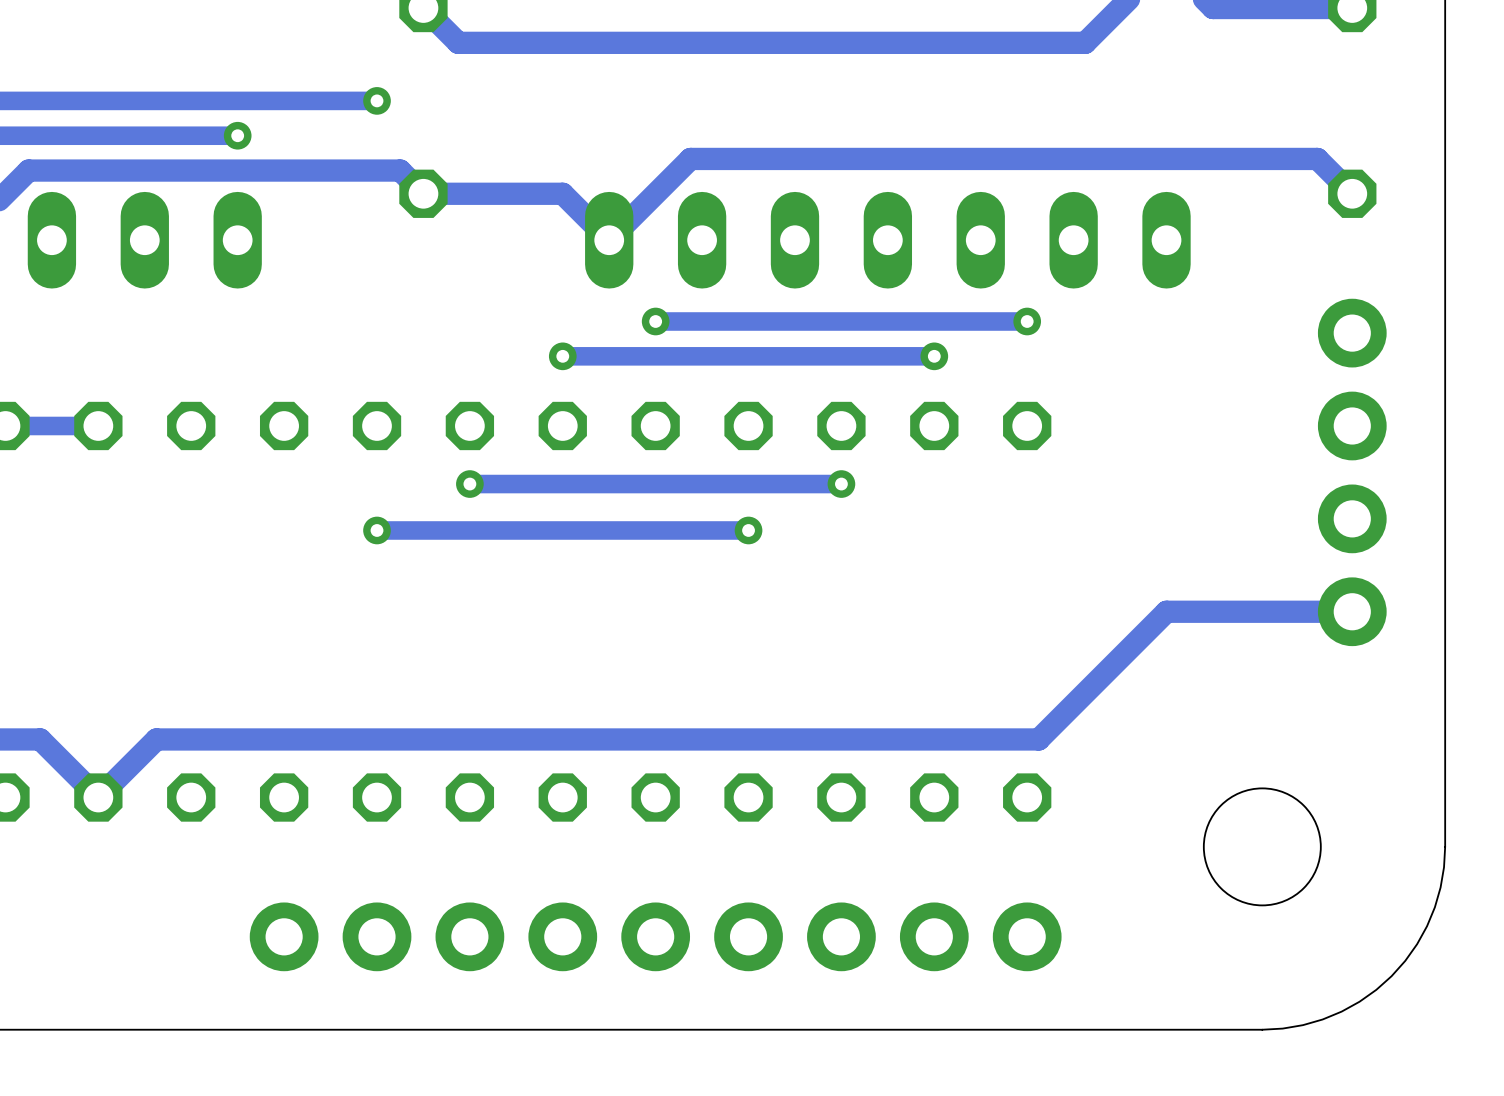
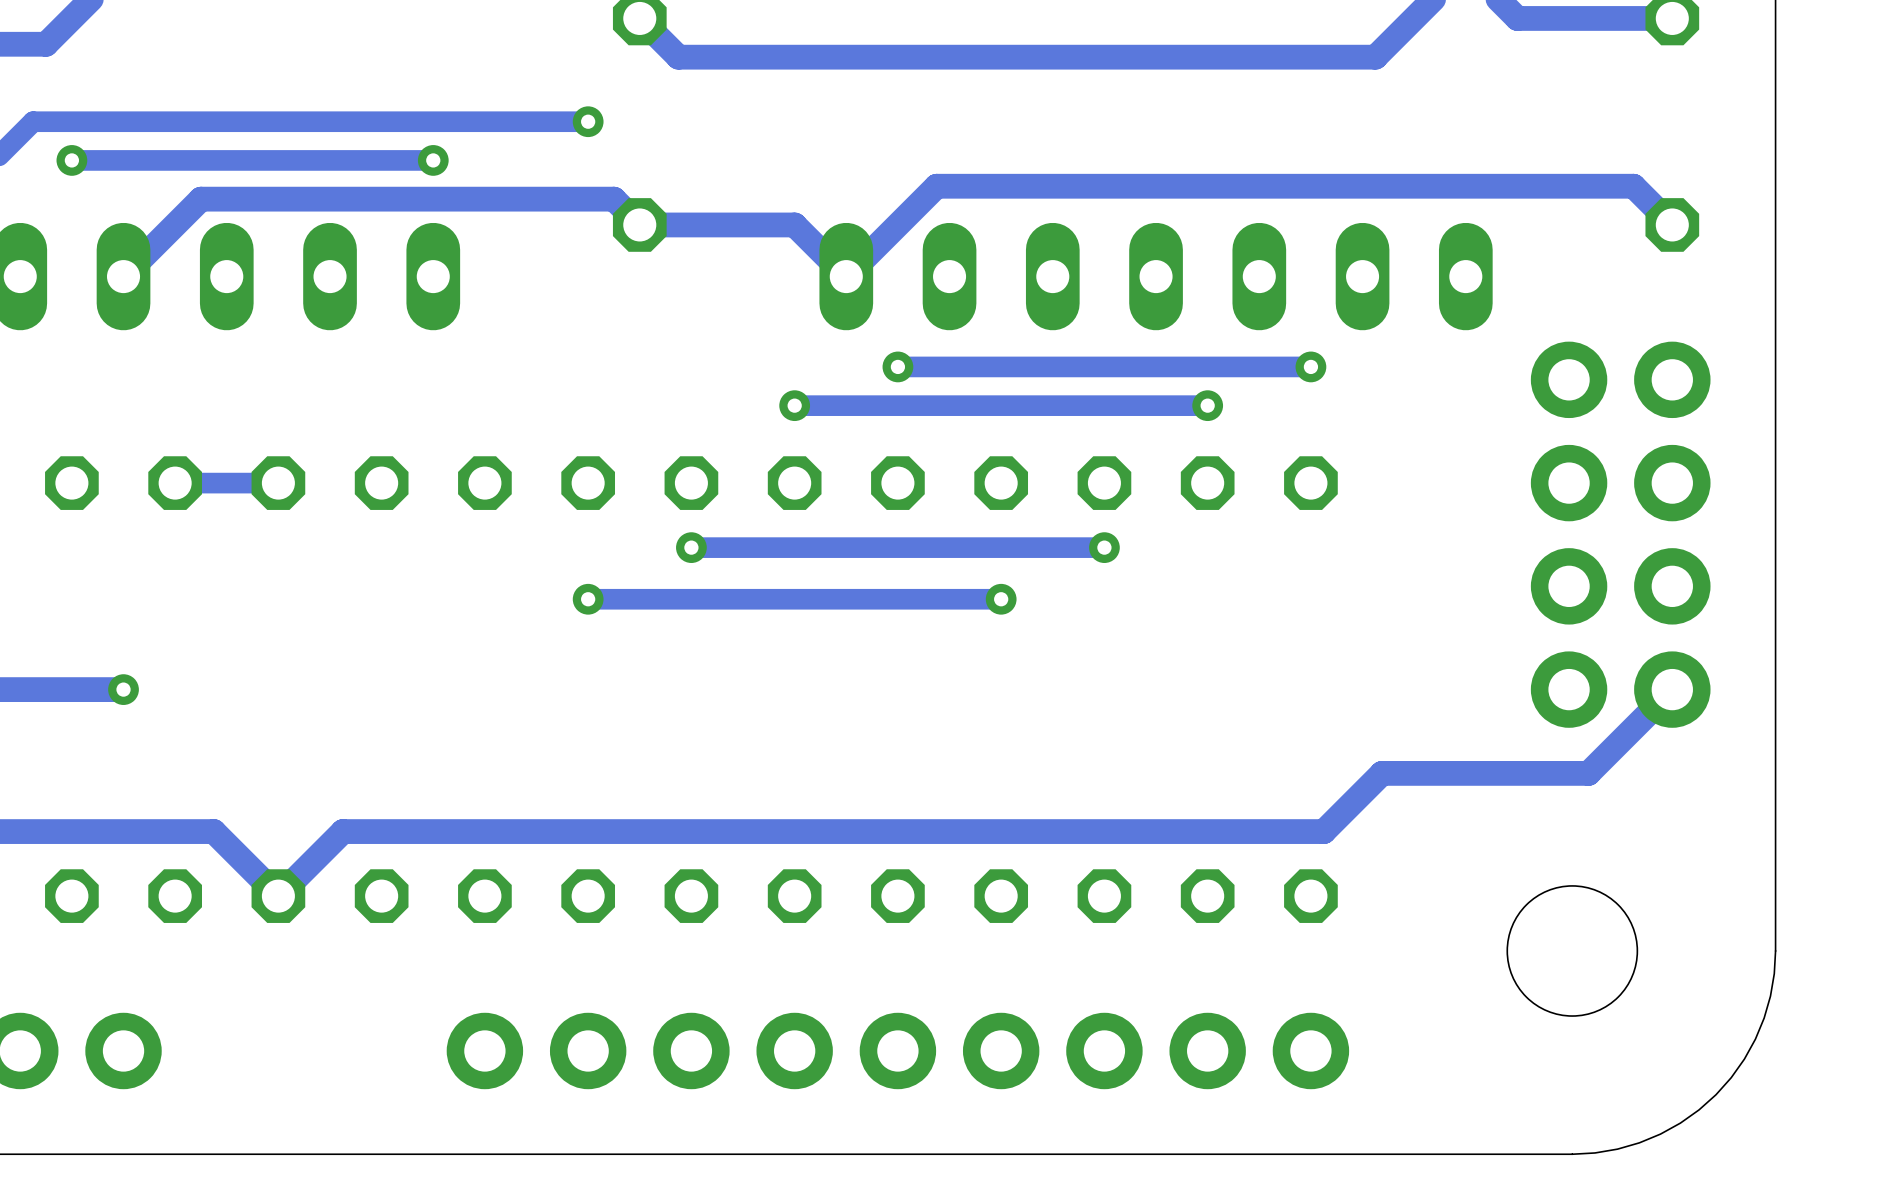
part: none -> (1569, 431)
part: none -> (1569, 637)
track: (1352, 611) (1166, 611) (1091, 687) -> (1672, 689) (1588, 773) (1382, 773)

